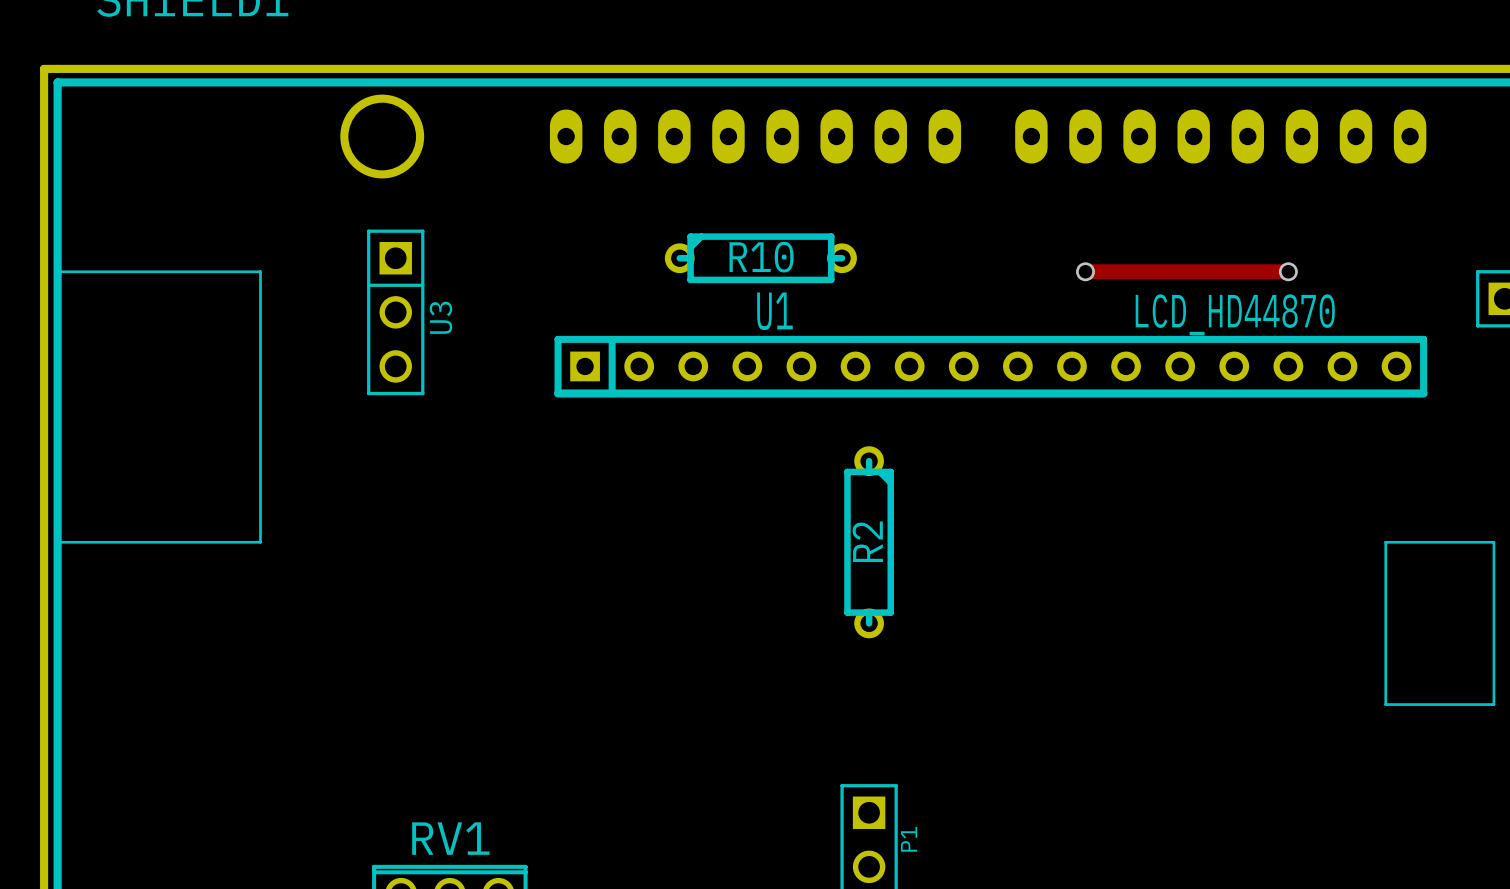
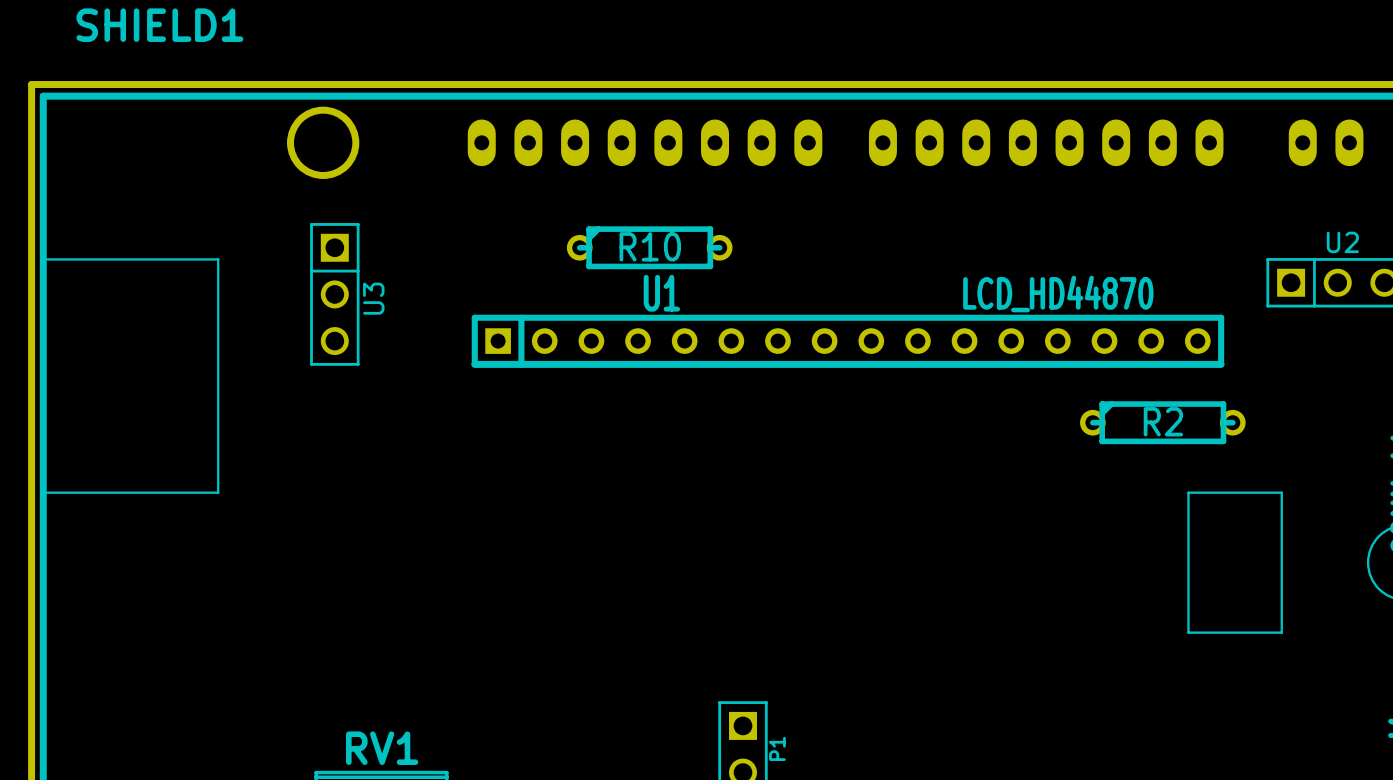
track: (1085, 271) (1288, 271) -> none
via: (1085, 271) -> none
via: (1288, 271) -> none
R2 rotation: 0° (869, 542) -> 90° counterclockwise (1162, 422)
R2 position: (869, 542) -> (1162, 422)

